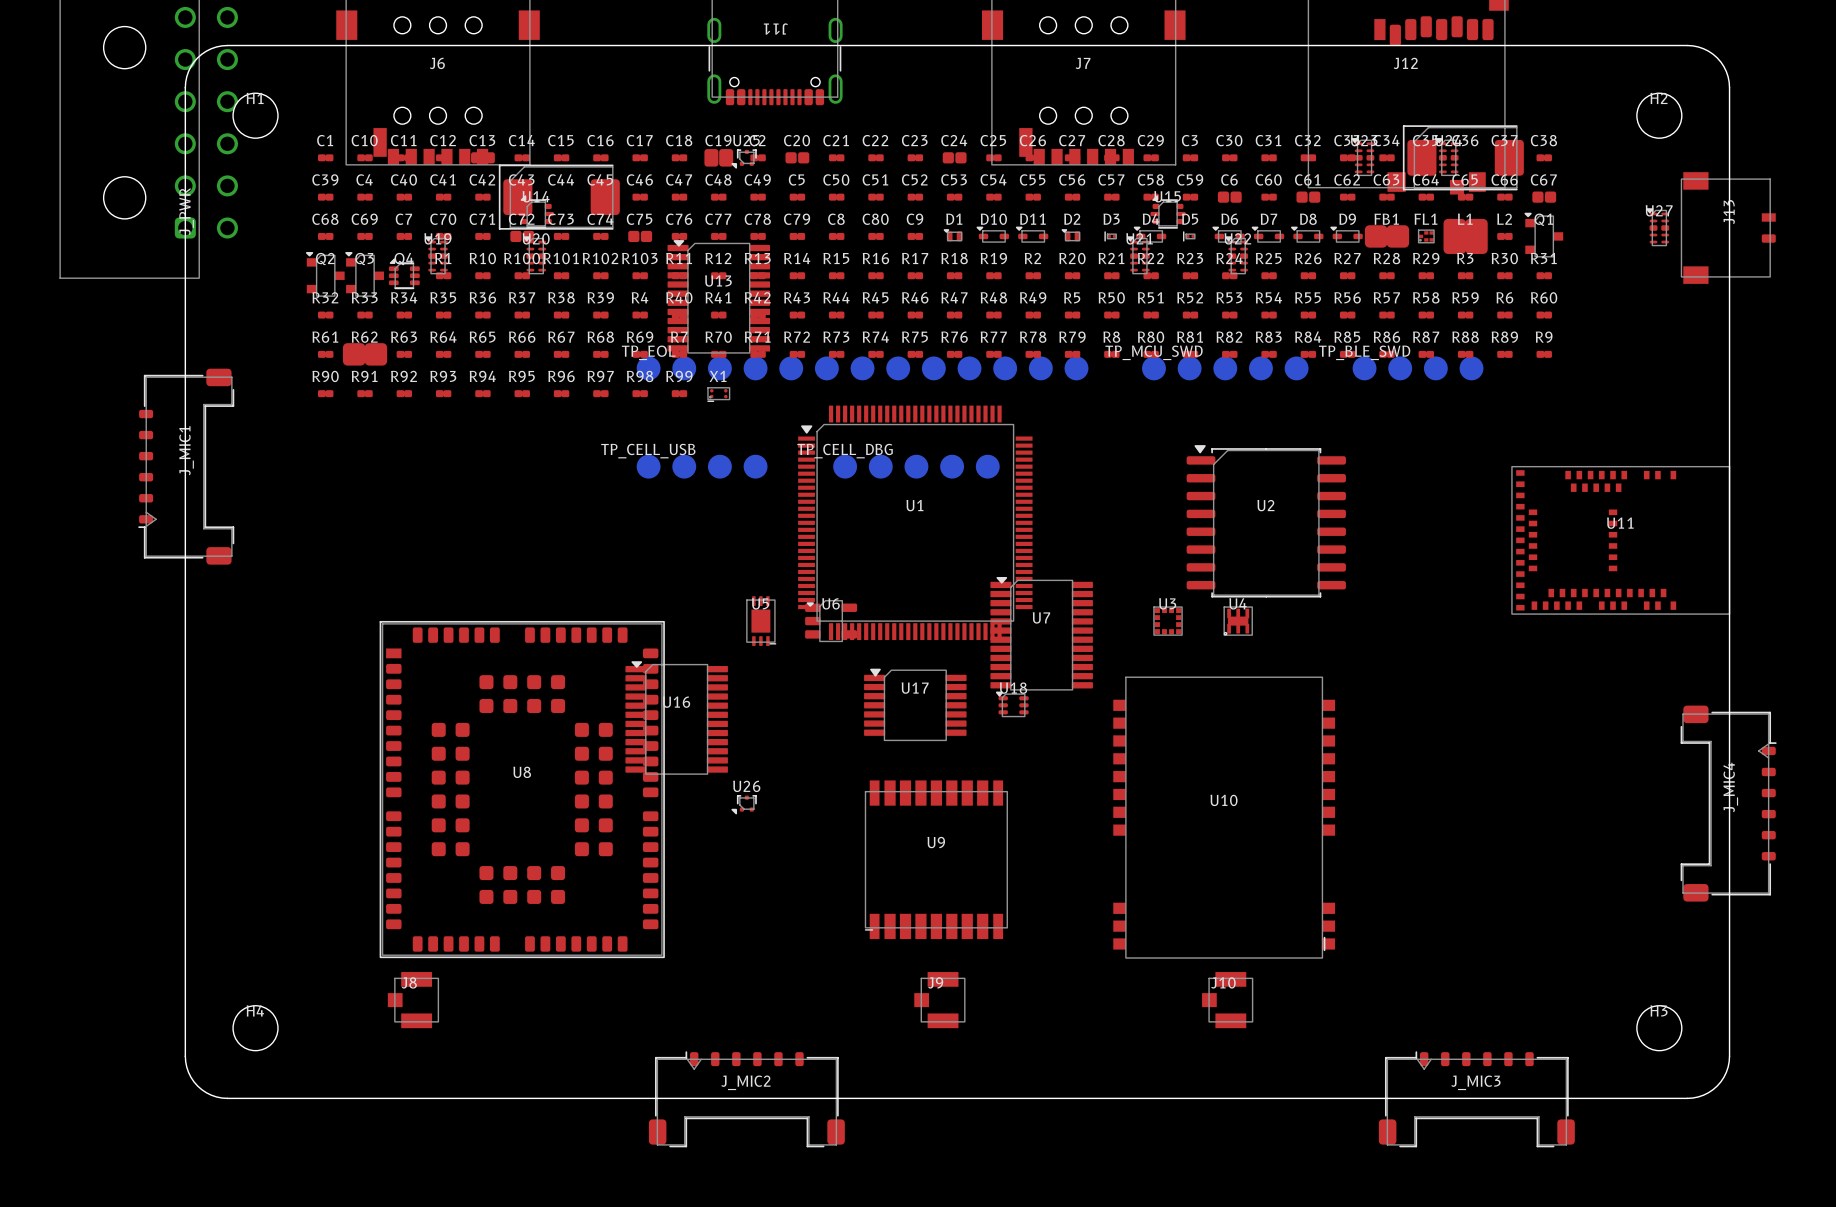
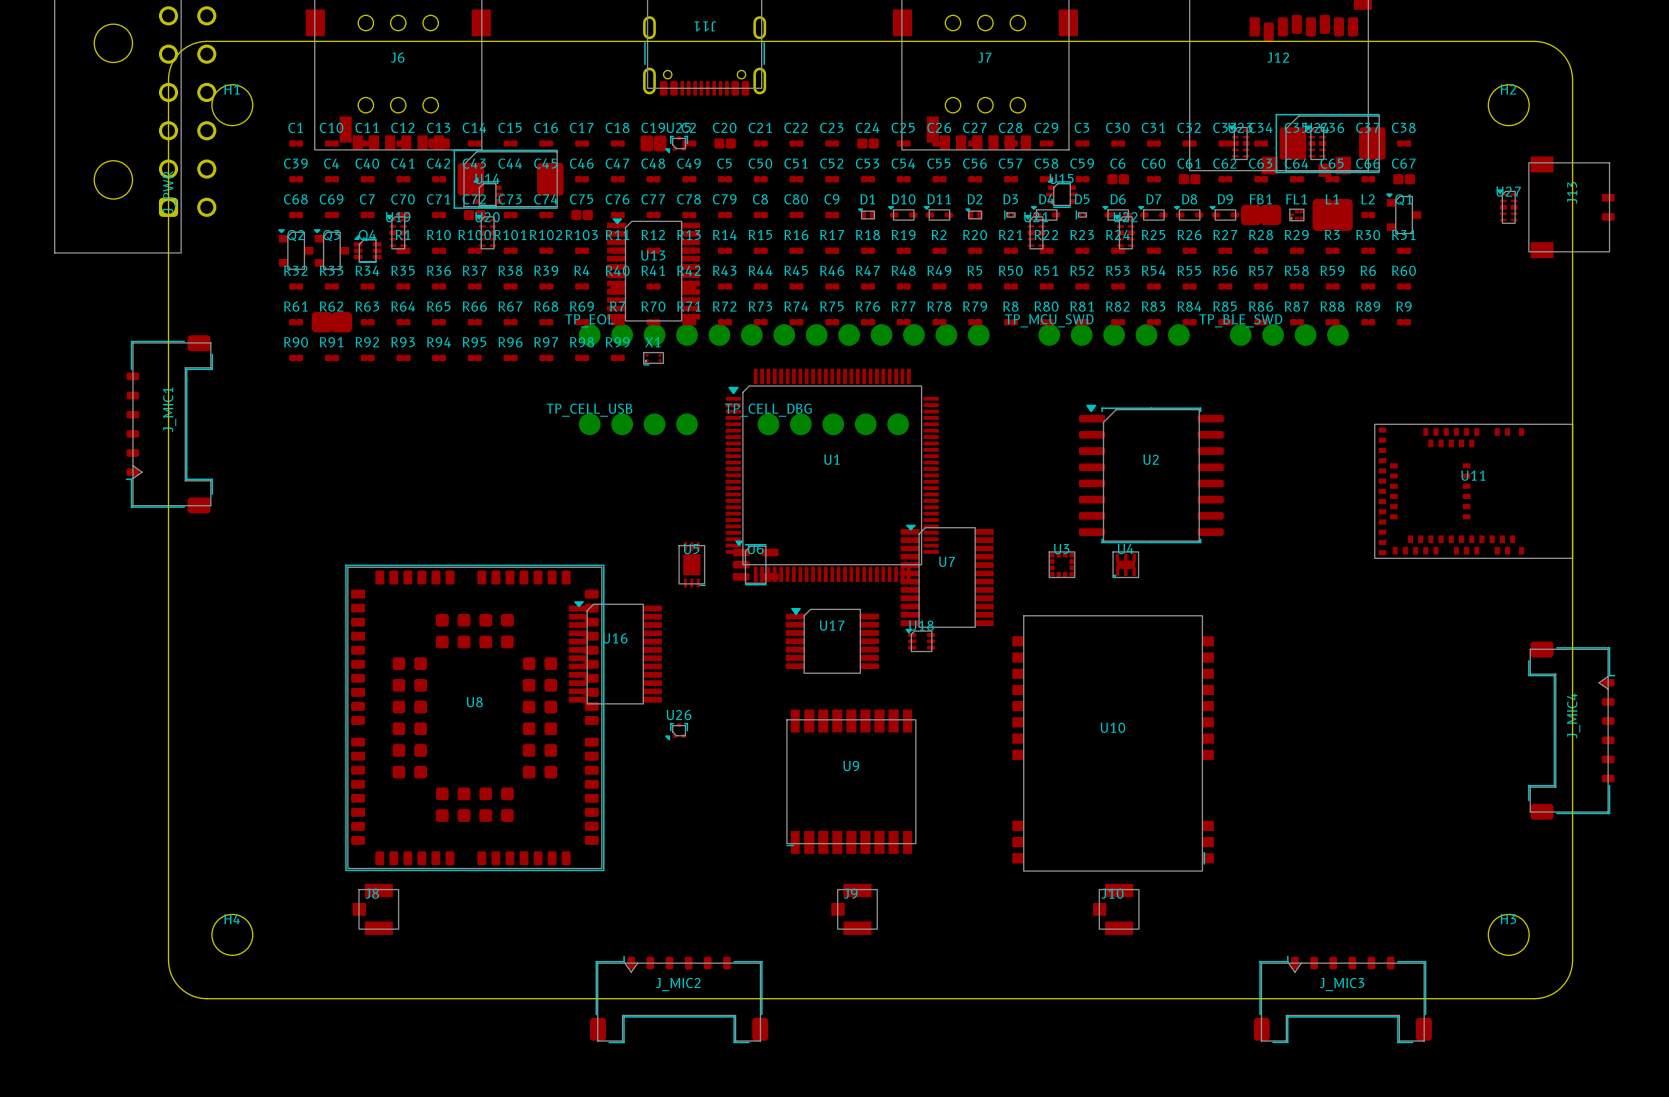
U6 footprint: [805, 600, 858, 643] -> [732, 540, 779, 586]

